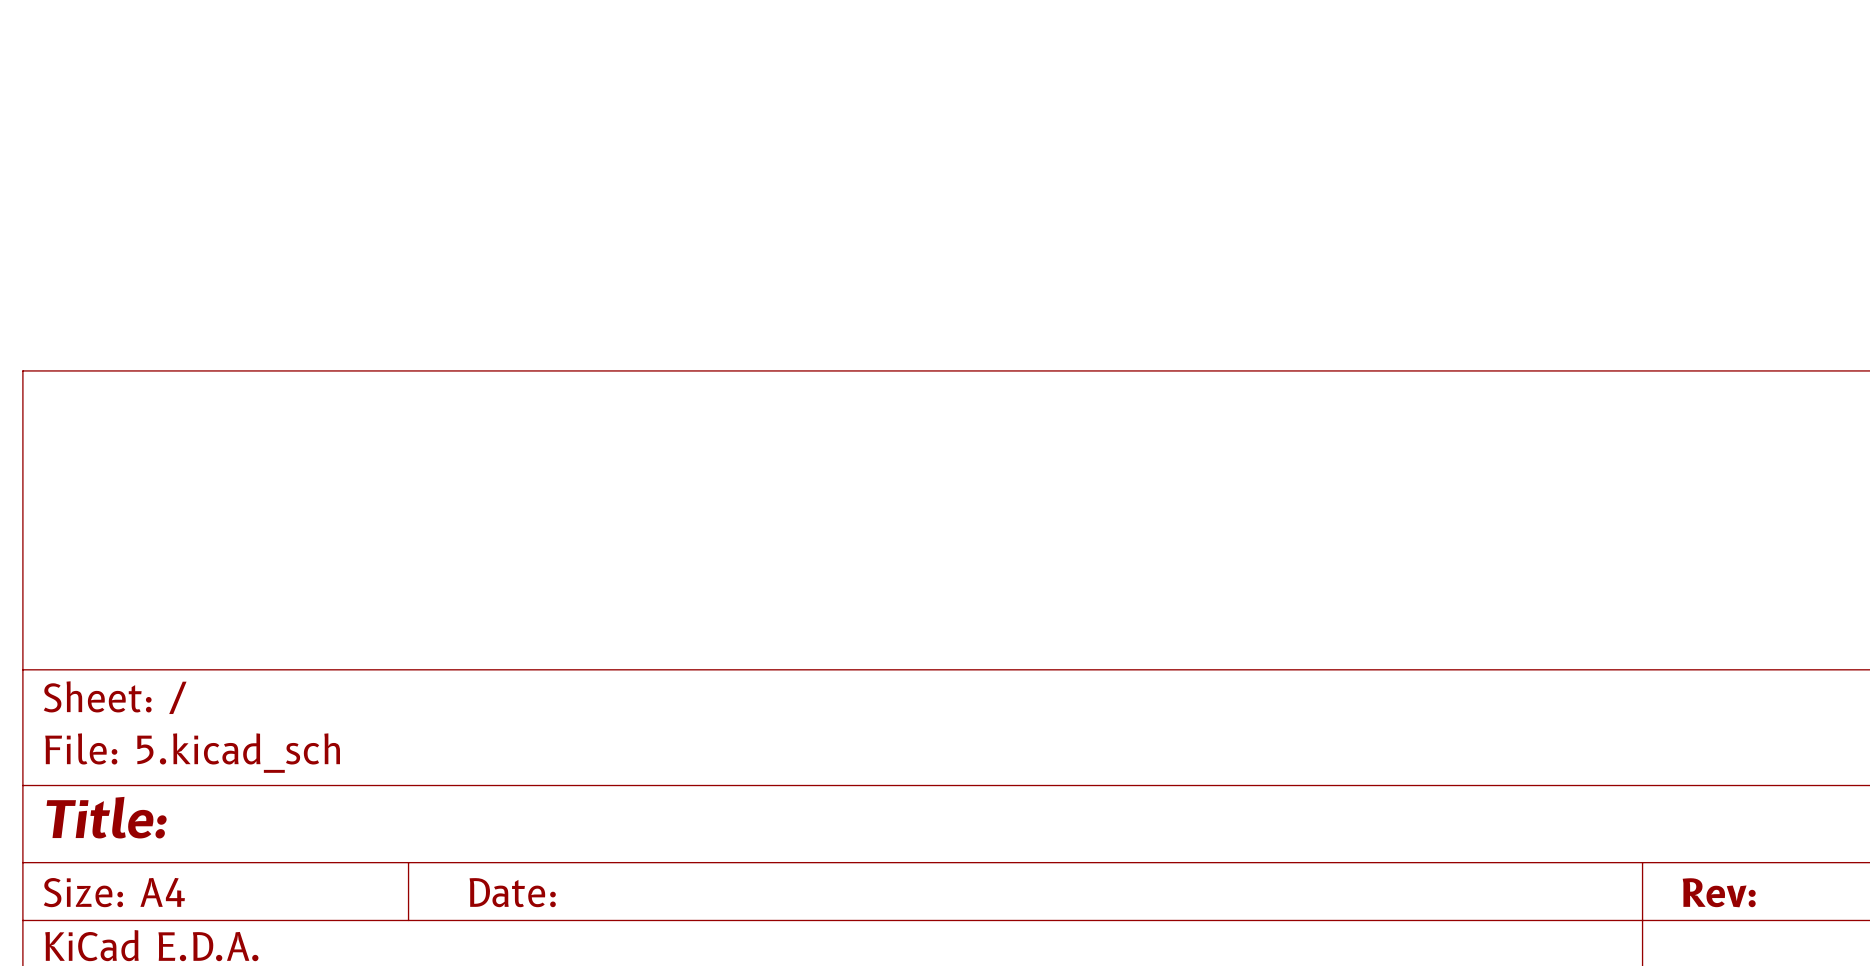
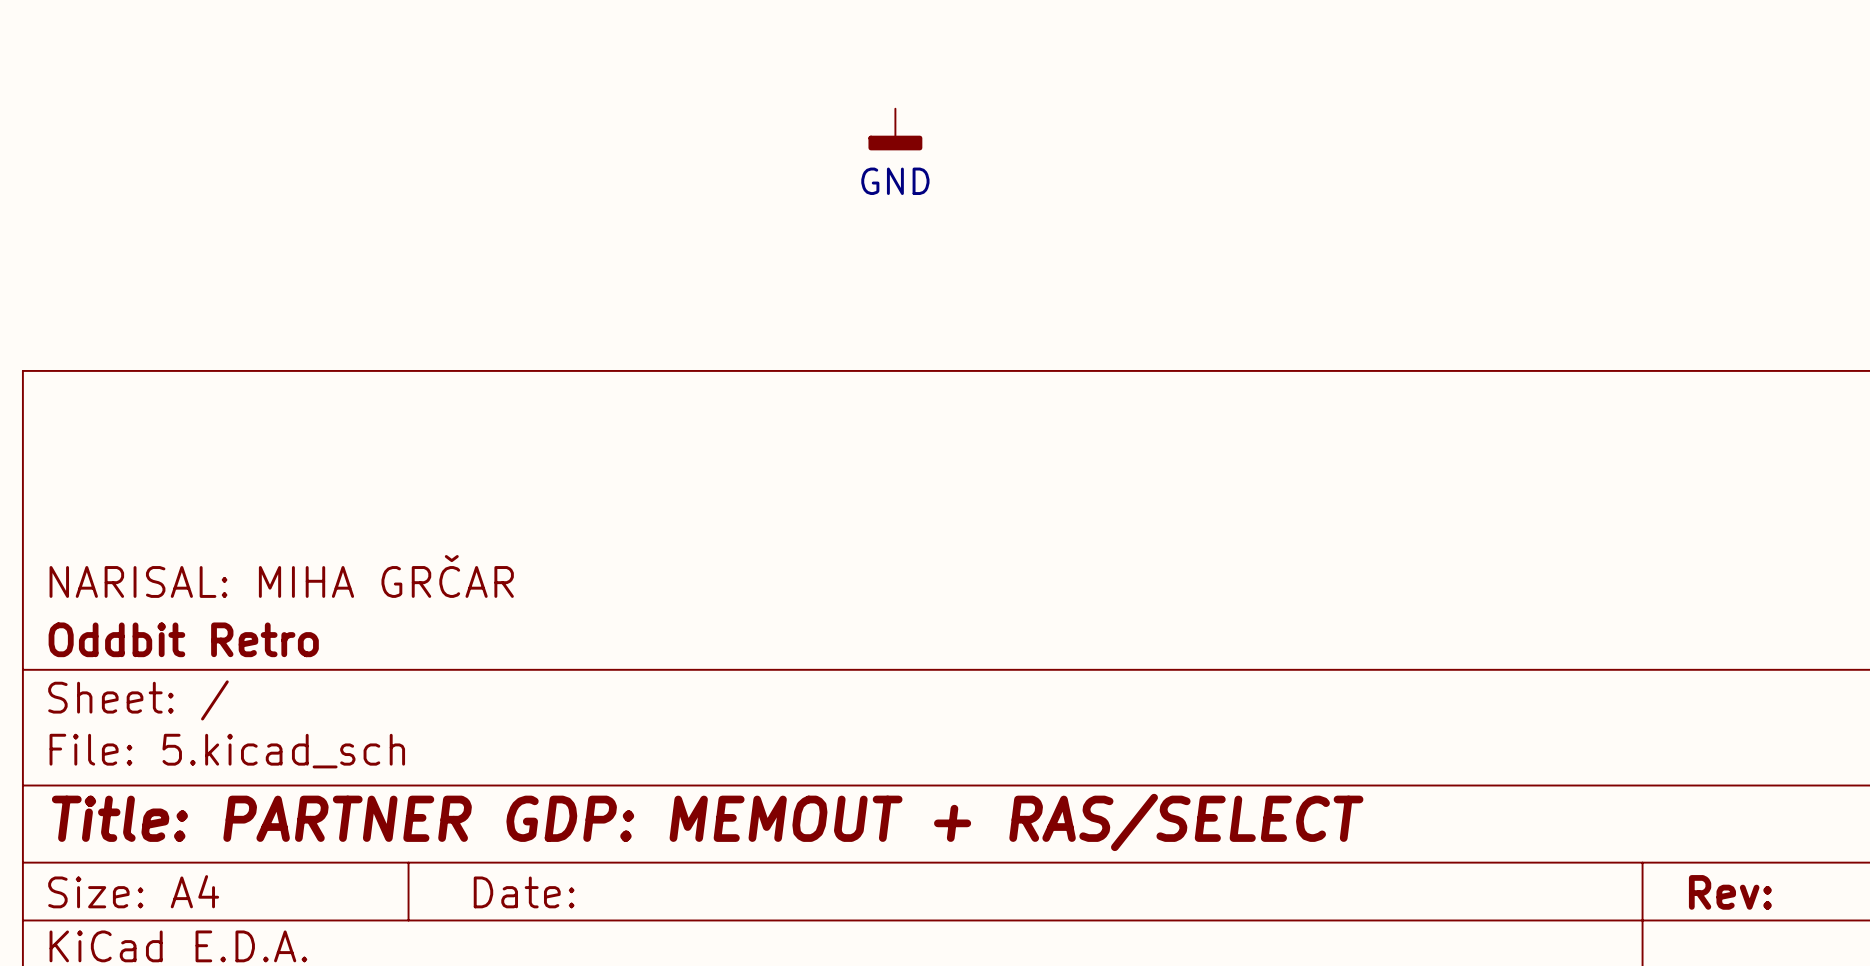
power symbol: none -> GND (895, 129)
title block: none -> NARISAL: MIHA GRČAR (281, 576)
title block: none -> Oddbit Retro (183, 639)
title block: Title: (106, 817) -> Title: PARTNER GDP: MEMOUT + RAS/SELECT (707, 822)

